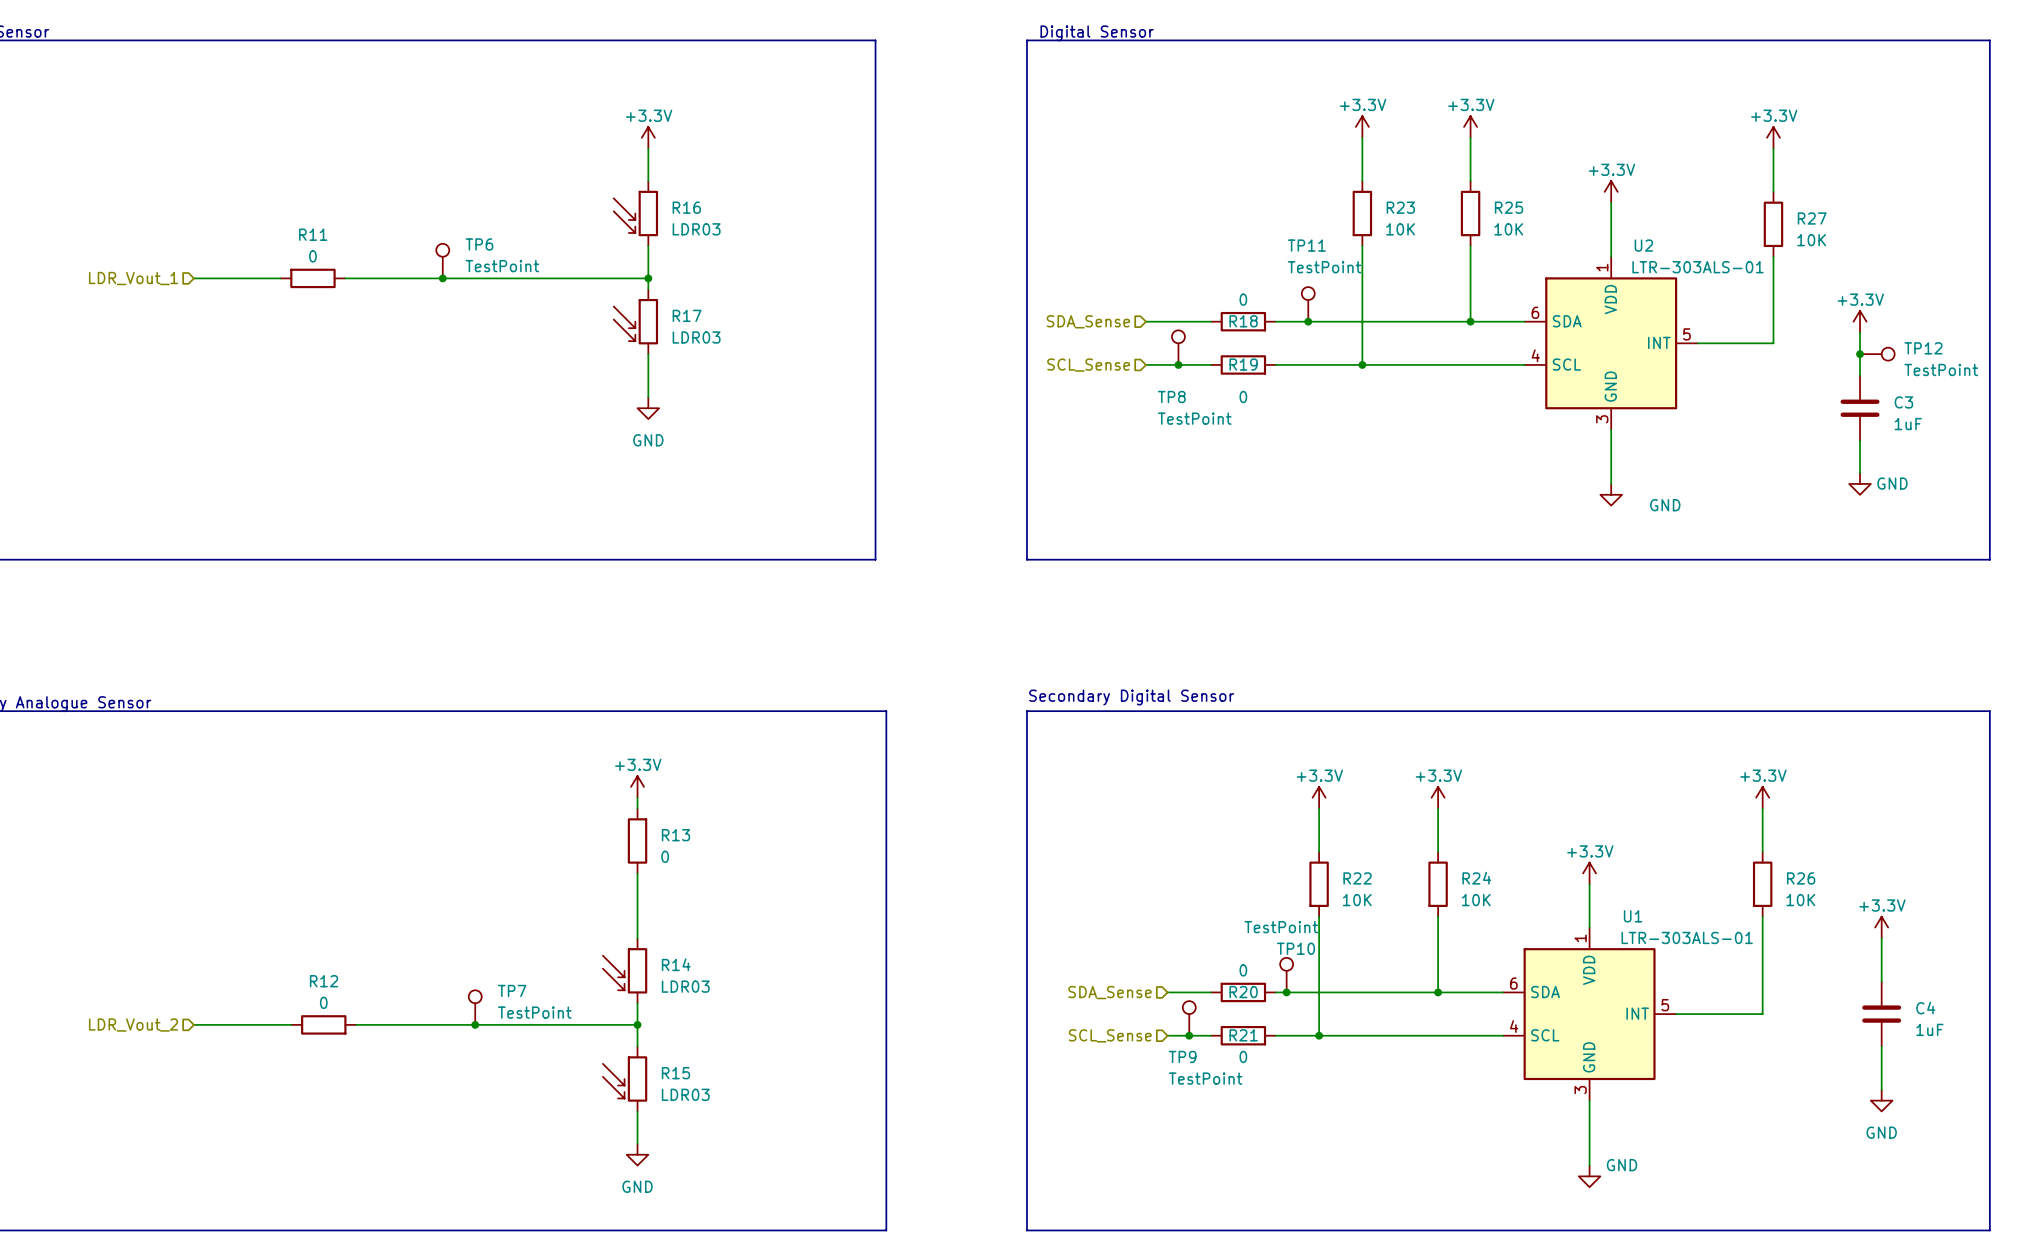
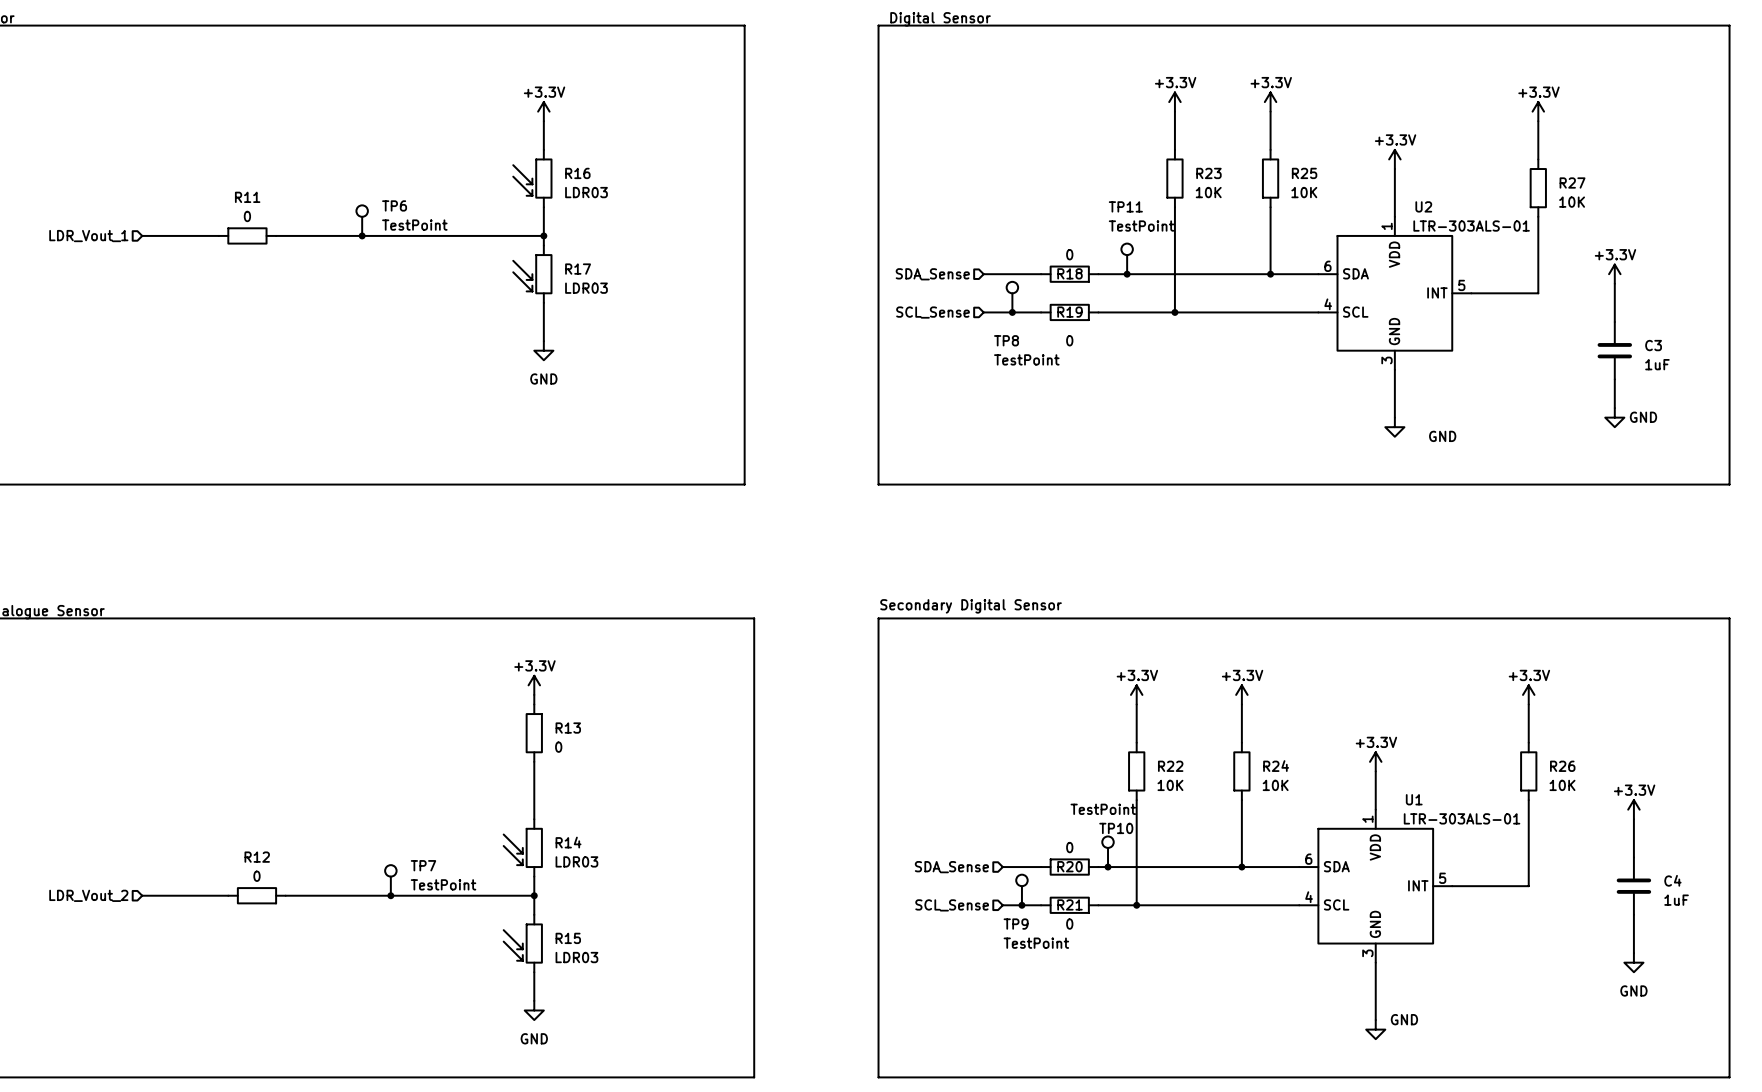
junction: (1860, 354) -> none
TP12: TestPoint (1877, 354) -> none

